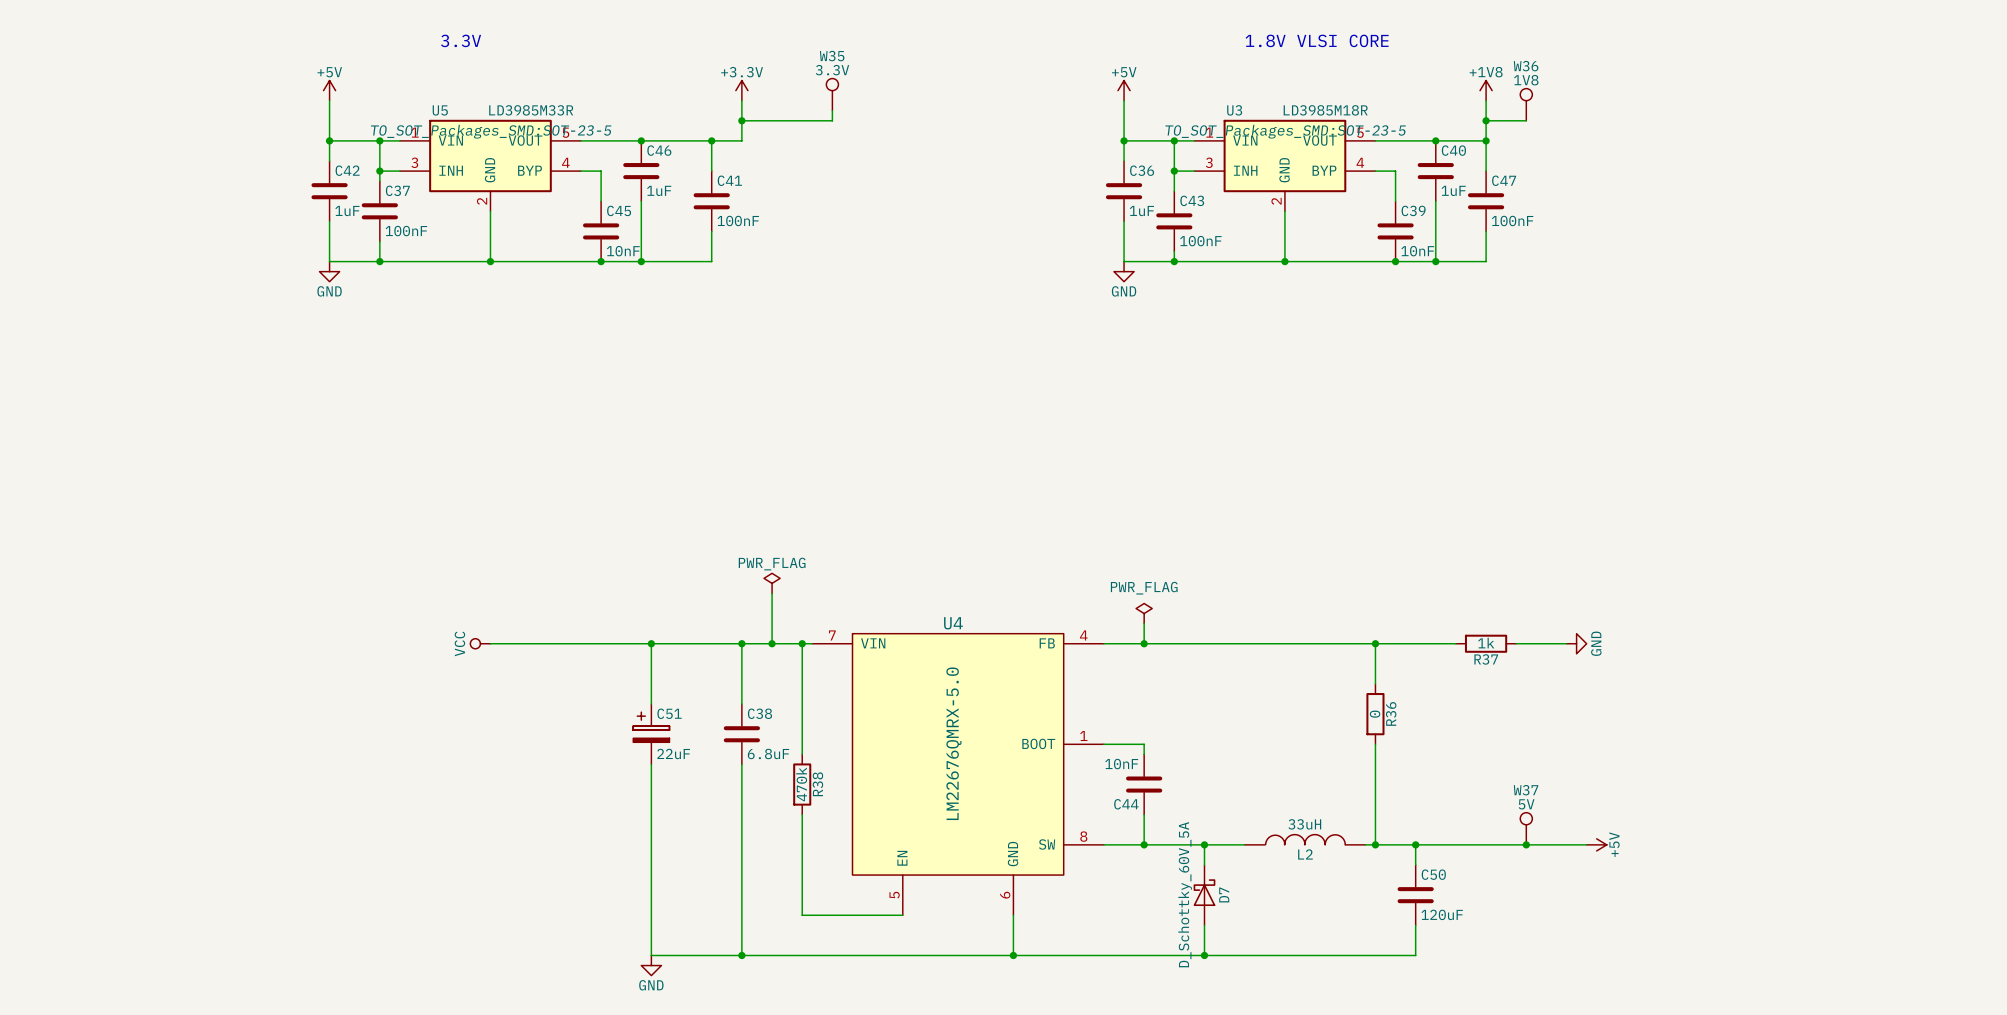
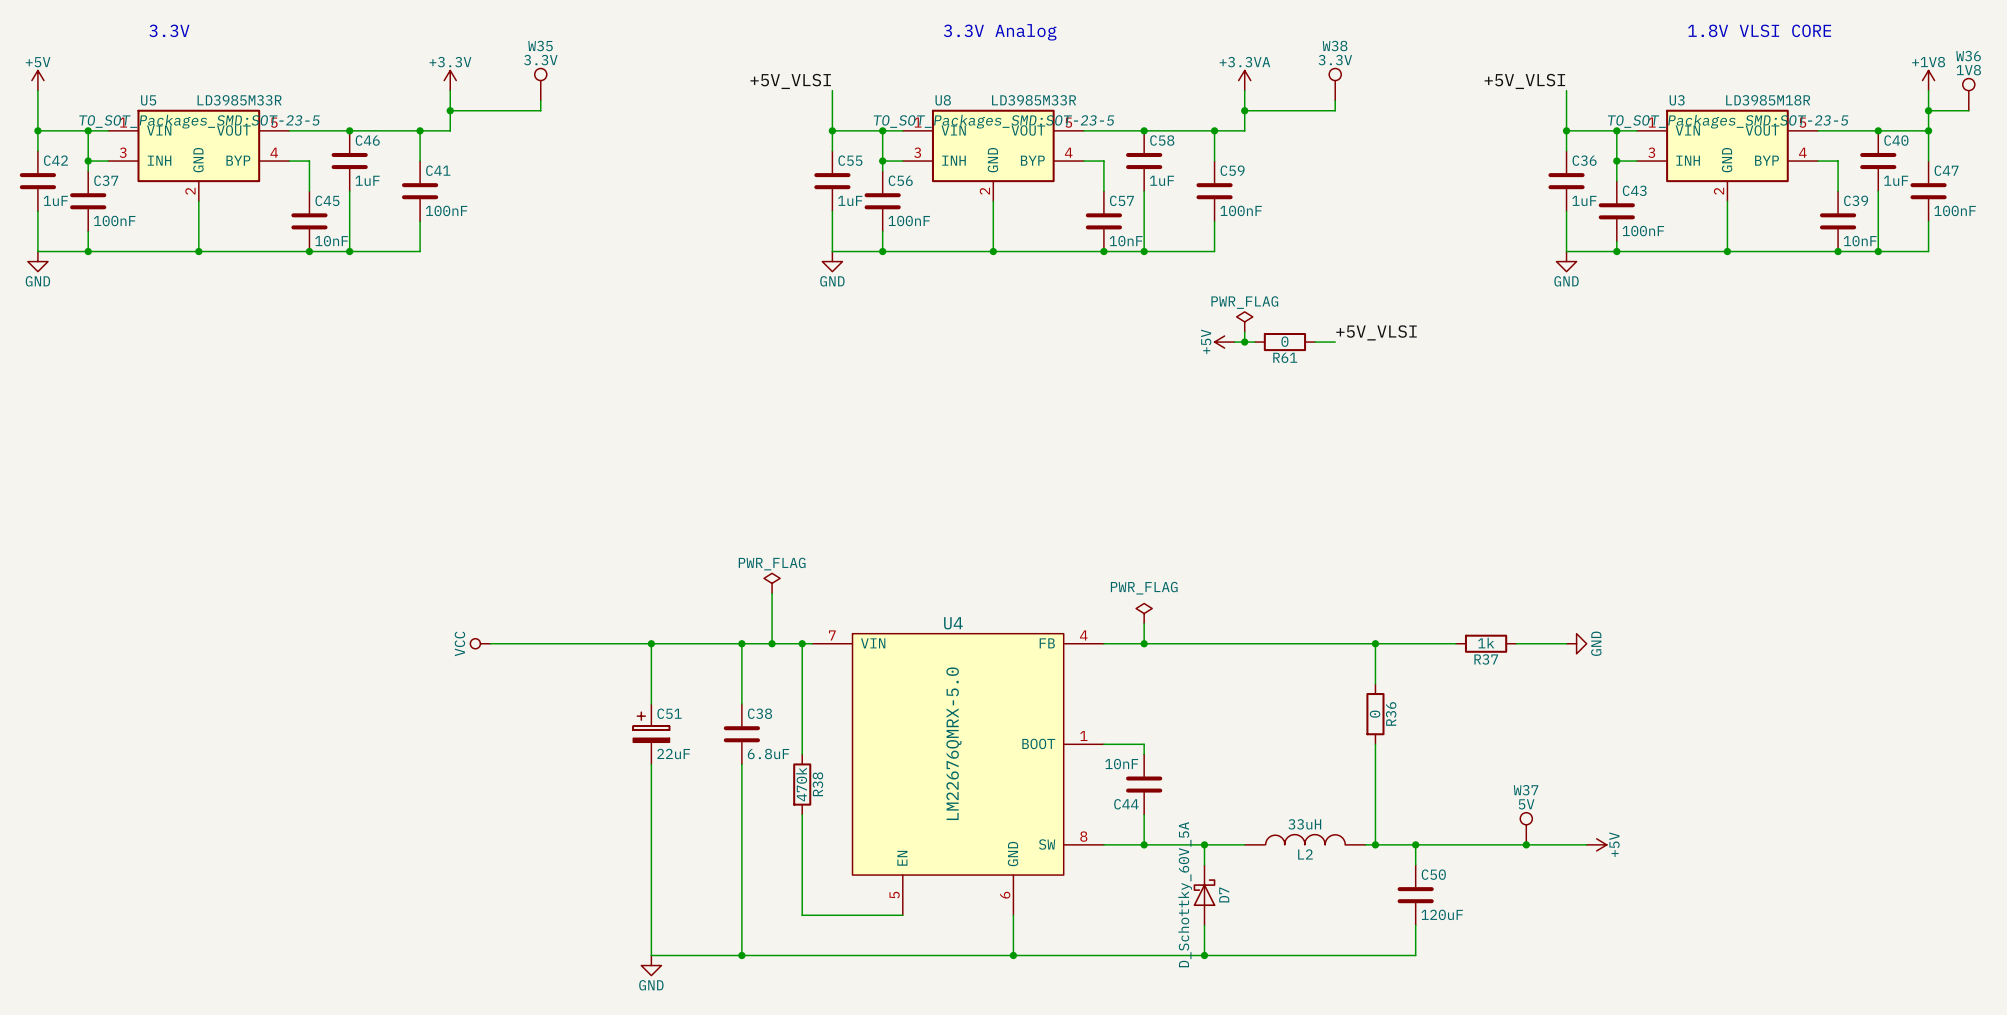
text: none -> 3.3V (169, 30)
text: none -> 1.8V VLSI CORE (1759, 30)
text: none -> 3.3V Analog (1000, 32)
text: 3.3V (461, 40) -> none
text: 1.8V VLSI CORE (1317, 40) -> none
power symbol: none -> +5V (37, 80)
power symbol: none -> +3.3V (450, 80)
power symbol: none -> +3.3VA (1244, 80)
power symbol: none -> +1V8 (1928, 80)
label: none -> +5V_VLSI (790, 81)
label: none -> +5V_VLSI (1524, 81)
W38: none -> 3.3V (1335, 84)
wire: none -> (37, 90) (37, 150)
power symbol: +5V (329, 90) -> none
wire: none -> (450, 90) (450, 130) (289, 130)
power symbol: +3.3V (741, 90) -> none
power symbol: +5V (1124, 90) -> none
wire: none -> (1244, 90) (1244, 130) (1083, 130)
power symbol: +1V8 (1486, 90) -> none
wire: none -> (1928, 90) (1928, 161)
W35 position: (832, 94) -> (540, 84)
wire: (329, 100) (329, 161) -> (349, 191) (349, 251)
wire: none -> (540, 100) (540, 110) (450, 110)
wire: (741, 100) (741, 140) (580, 140) -> none
wire: (1124, 100) (1124, 161) -> (1144, 191) (1144, 251)
wire: none -> (1335, 100) (1335, 110) (1244, 110)
wire: (1486, 100) (1486, 171) -> none
W36 position: (1526, 104) -> (1968, 94)
junction: none -> (450, 110)
junction: none -> (1244, 110)
wire: none -> (1928, 110) (1968, 110)
junction: none -> (1928, 110)
wire: (741, 120) (832, 120) -> (832, 150) (832, 120)
junction: (741, 120) -> none
wire: (1486, 120) (1526, 120) -> none
junction: (1486, 120) -> none
wire: none -> (37, 130) (108, 130)
junction: none -> (37, 130)
wire: none -> (88, 130) (88, 171)
junction: none -> (88, 130)
junction: none -> (349, 130)
wire: none -> (420, 130) (420, 161)
junction: none -> (420, 130)
wire: none -> (832, 130) (902, 130)
junction: none -> (832, 130)
wire: none -> (882, 130) (882, 171)
junction: none -> (882, 130)
junction: none -> (1144, 130)
wire: none -> (1214, 130) (1214, 161)
junction: none -> (1214, 130)
wire: none -> (1566, 130) (1636, 130)
junction: none -> (1566, 130)
wire: none -> (1616, 130) (1616, 181)
junction: none -> (1616, 130)
wire: none -> (1817, 130) (1928, 130)
junction: none -> (1878, 130)
junction: none -> (1928, 130)
wire: (329, 140) (399, 140) -> none
junction: (329, 140) -> none
wire: (379, 140) (379, 181) -> none
junction: (379, 140) -> none
junction: (641, 140) -> none
wire: (711, 140) (711, 171) -> none
junction: (711, 140) -> none
wire: (1124, 140) (1194, 140) -> none
junction: (1124, 140) -> none
wire: (1174, 140) (1174, 191) -> (993, 201) (993, 251)
junction: (1174, 140) -> none
wire: (1375, 140) (1486, 140) -> none
junction: (1435, 140) -> none
junction: (1486, 140) -> none
U8: none -> LD3985M33R (993, 155)
wire: none -> (88, 161) (108, 161)
junction: none -> (88, 161)
wire: none -> (289, 161) (309, 161) (309, 191)
wire: none -> (882, 161) (902, 161)
junction: none -> (882, 161)
wire: none -> (1083, 161) (1103, 161) (1103, 191)
C58: none -> 1uF (1144, 161)
wire: none -> (1616, 161) (1636, 161)
junction: none -> (1616, 161)
wire: none -> (1817, 161) (1838, 161) (1838, 191)
U5 position: (490, 165) -> (198, 155)
U3 position: (1284, 165) -> (1727, 155)
wire: (379, 171) (399, 171) -> none
junction: (379, 171) -> none
wire: (580, 171) (601, 171) (601, 201) -> none
C46 position: (641, 171) -> (349, 161)
wire: (1174, 171) (1194, 171) -> (1234, 342) (1254, 342)
junction: (1174, 171) -> none
wire: (1375, 171) (1395, 171) (1395, 201) -> none
C40 position: (1435, 171) -> (1878, 161)
C55: none -> 1uF (832, 181)
C42 position: (329, 191) -> (37, 181)
C36 position: (1124, 191) -> (1566, 181)
C59: none -> 100nF (1214, 191)
wire: none -> (1878, 191) (1878, 251)
wire: none -> (198, 201) (198, 251)
wire: (641, 201) (641, 261) -> none
C41 position: (711, 201) -> (420, 191)
C56: none -> 100nF (882, 201)
wire: (1435, 201) (1435, 261) -> (1566, 90) (1566, 150)
C47 position: (1486, 201) -> (1928, 191)
wire: none -> (1727, 201) (1727, 251)
wire: none -> (37, 211) (37, 251) (420, 251) (420, 221)
C37 position: (379, 211) -> (88, 201)
wire: (490, 211) (490, 261) -> none
wire: none -> (832, 211) (832, 251) (1214, 251) (1214, 221)
wire: (1284, 211) (1284, 261) -> none
wire: none -> (1566, 211) (1566, 251) (1928, 251) (1928, 221)
wire: (329, 221) (329, 261) (711, 261) (711, 231) -> none
C57: none -> 10nF (1103, 221)
wire: (1124, 221) (1124, 261) (1486, 261) (1486, 231) -> none
C43 position: (1174, 221) -> (1616, 211)
wire: none -> (88, 231) (88, 251)
C45 position: (601, 231) -> (309, 221)
wire: none -> (882, 231) (882, 251)
C39 position: (1395, 231) -> (1838, 221)
wire: (379, 241) (379, 261) -> none
wire: none -> (1616, 241) (1616, 251)
junction: none -> (88, 251)
junction: none -> (198, 251)
junction: none -> (309, 251)
junction: none -> (882, 251)
junction: none -> (993, 251)
junction: none -> (1103, 251)
wire: (1174, 251) (1174, 261) -> (1244, 331) (1244, 342)
junction: none -> (1616, 251)
junction: none -> (1727, 251)
junction: none -> (1838, 251)
junction: none -> (1878, 251)
power symbol: none -> GND (37, 261)
junction position: (379, 261) -> (349, 251)
junction: (490, 261) -> none
junction: (601, 261) -> none
junction: (641, 261) -> none
power symbol: none -> GND (832, 261)
junction position: (1174, 261) -> (1144, 251)
junction: (1284, 261) -> none
junction: (1395, 261) -> none
junction: (1435, 261) -> none
power symbol: none -> GND (1566, 261)
power symbol: GND (329, 271) -> none
power symbol: GND (1124, 271) -> none
power symbol: none -> PWR_FLAG (1244, 321)
label: none -> +5V_VLSI (1376, 332)
power symbol: none -> +5V (1224, 342)
junction: none -> (1244, 342)
R61: none -> 0 (1284, 342)
wire: none -> (1315, 342) (1335, 342)

